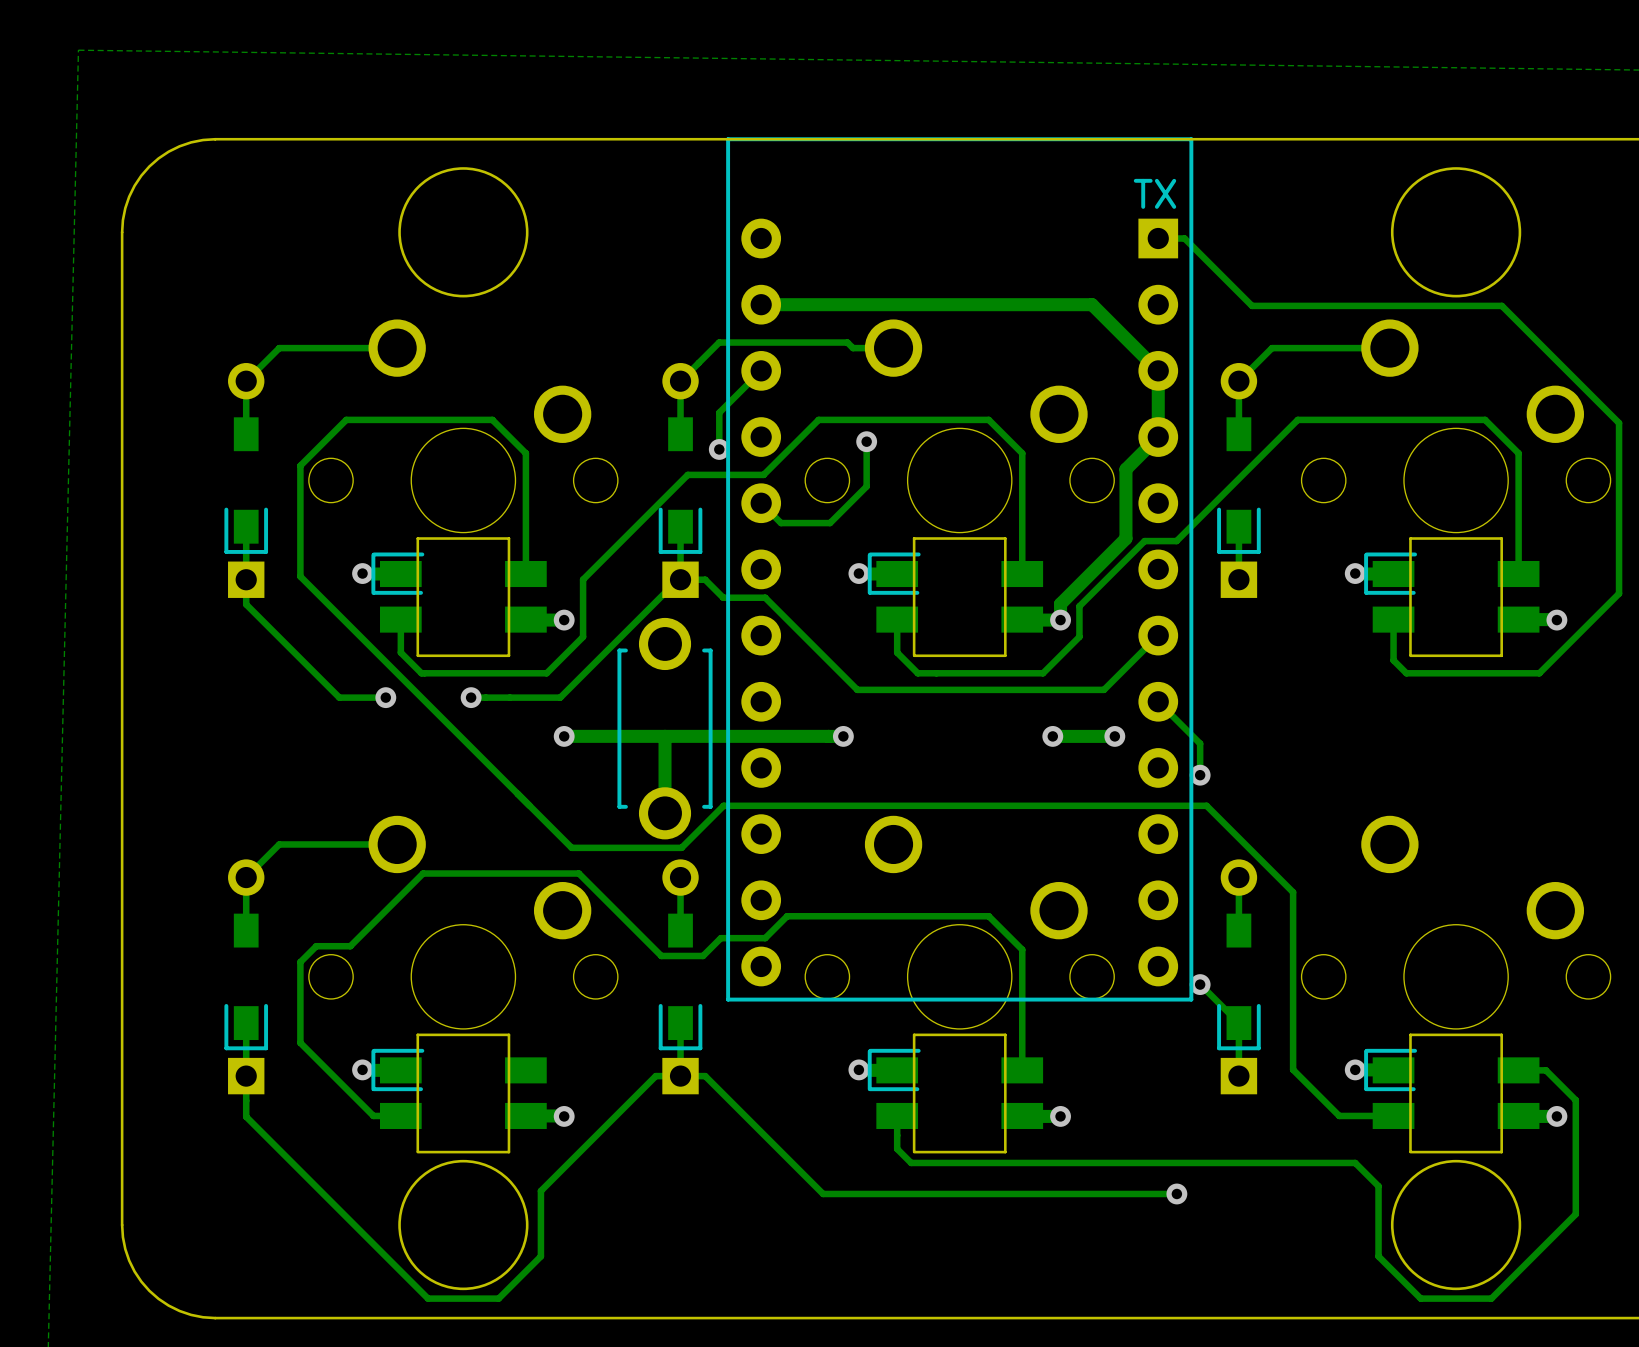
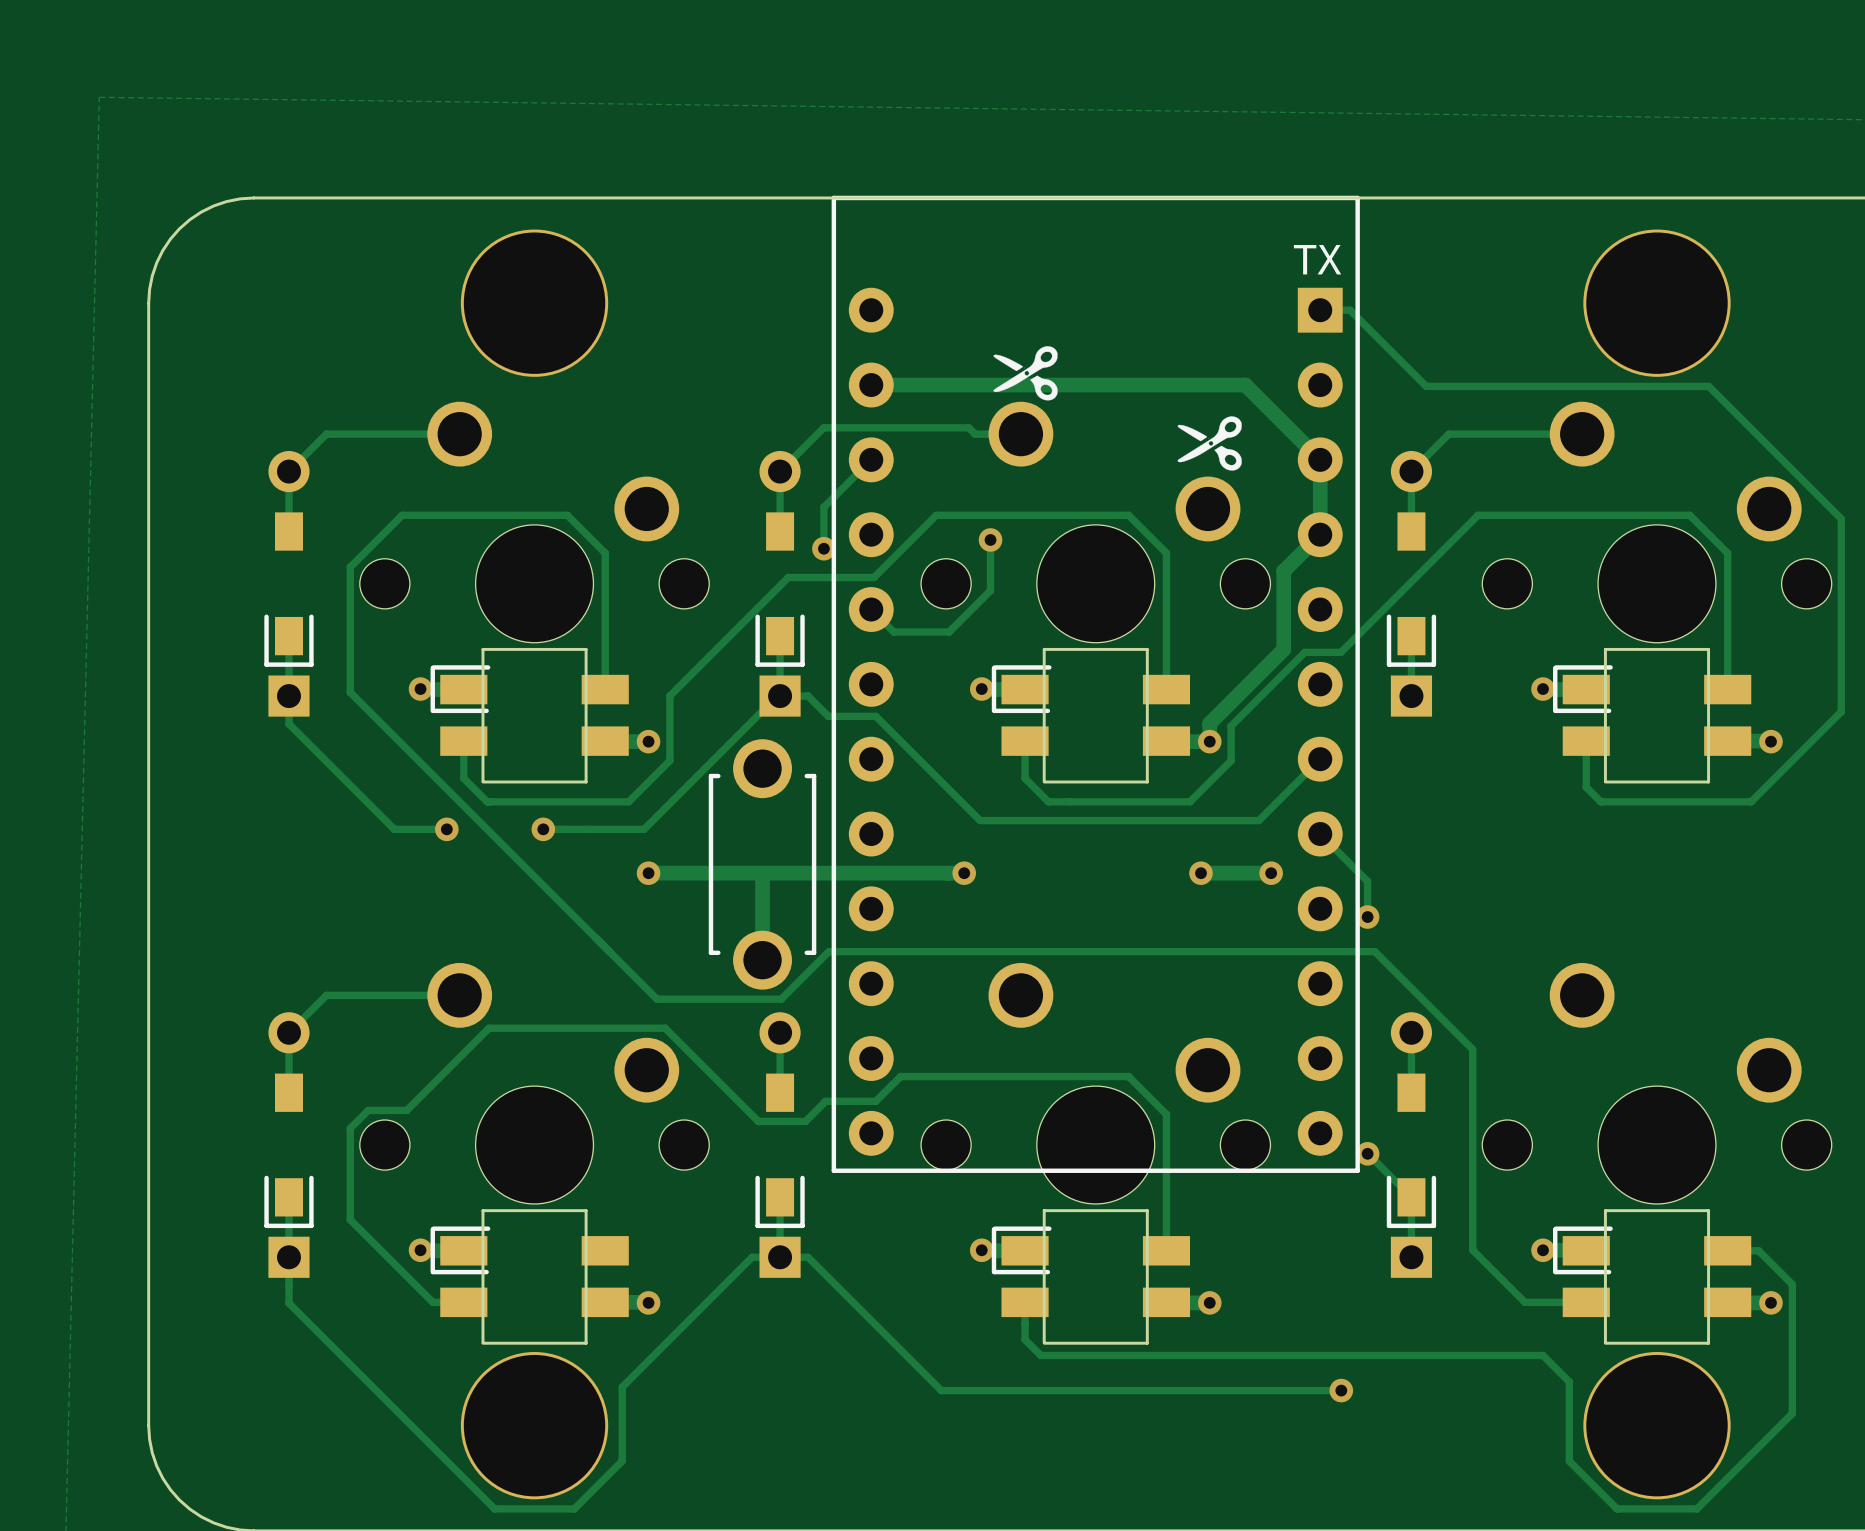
drawing: none -> [993, 346, 1058, 401]
drawing: none -> [1177, 416, 1242, 471]

